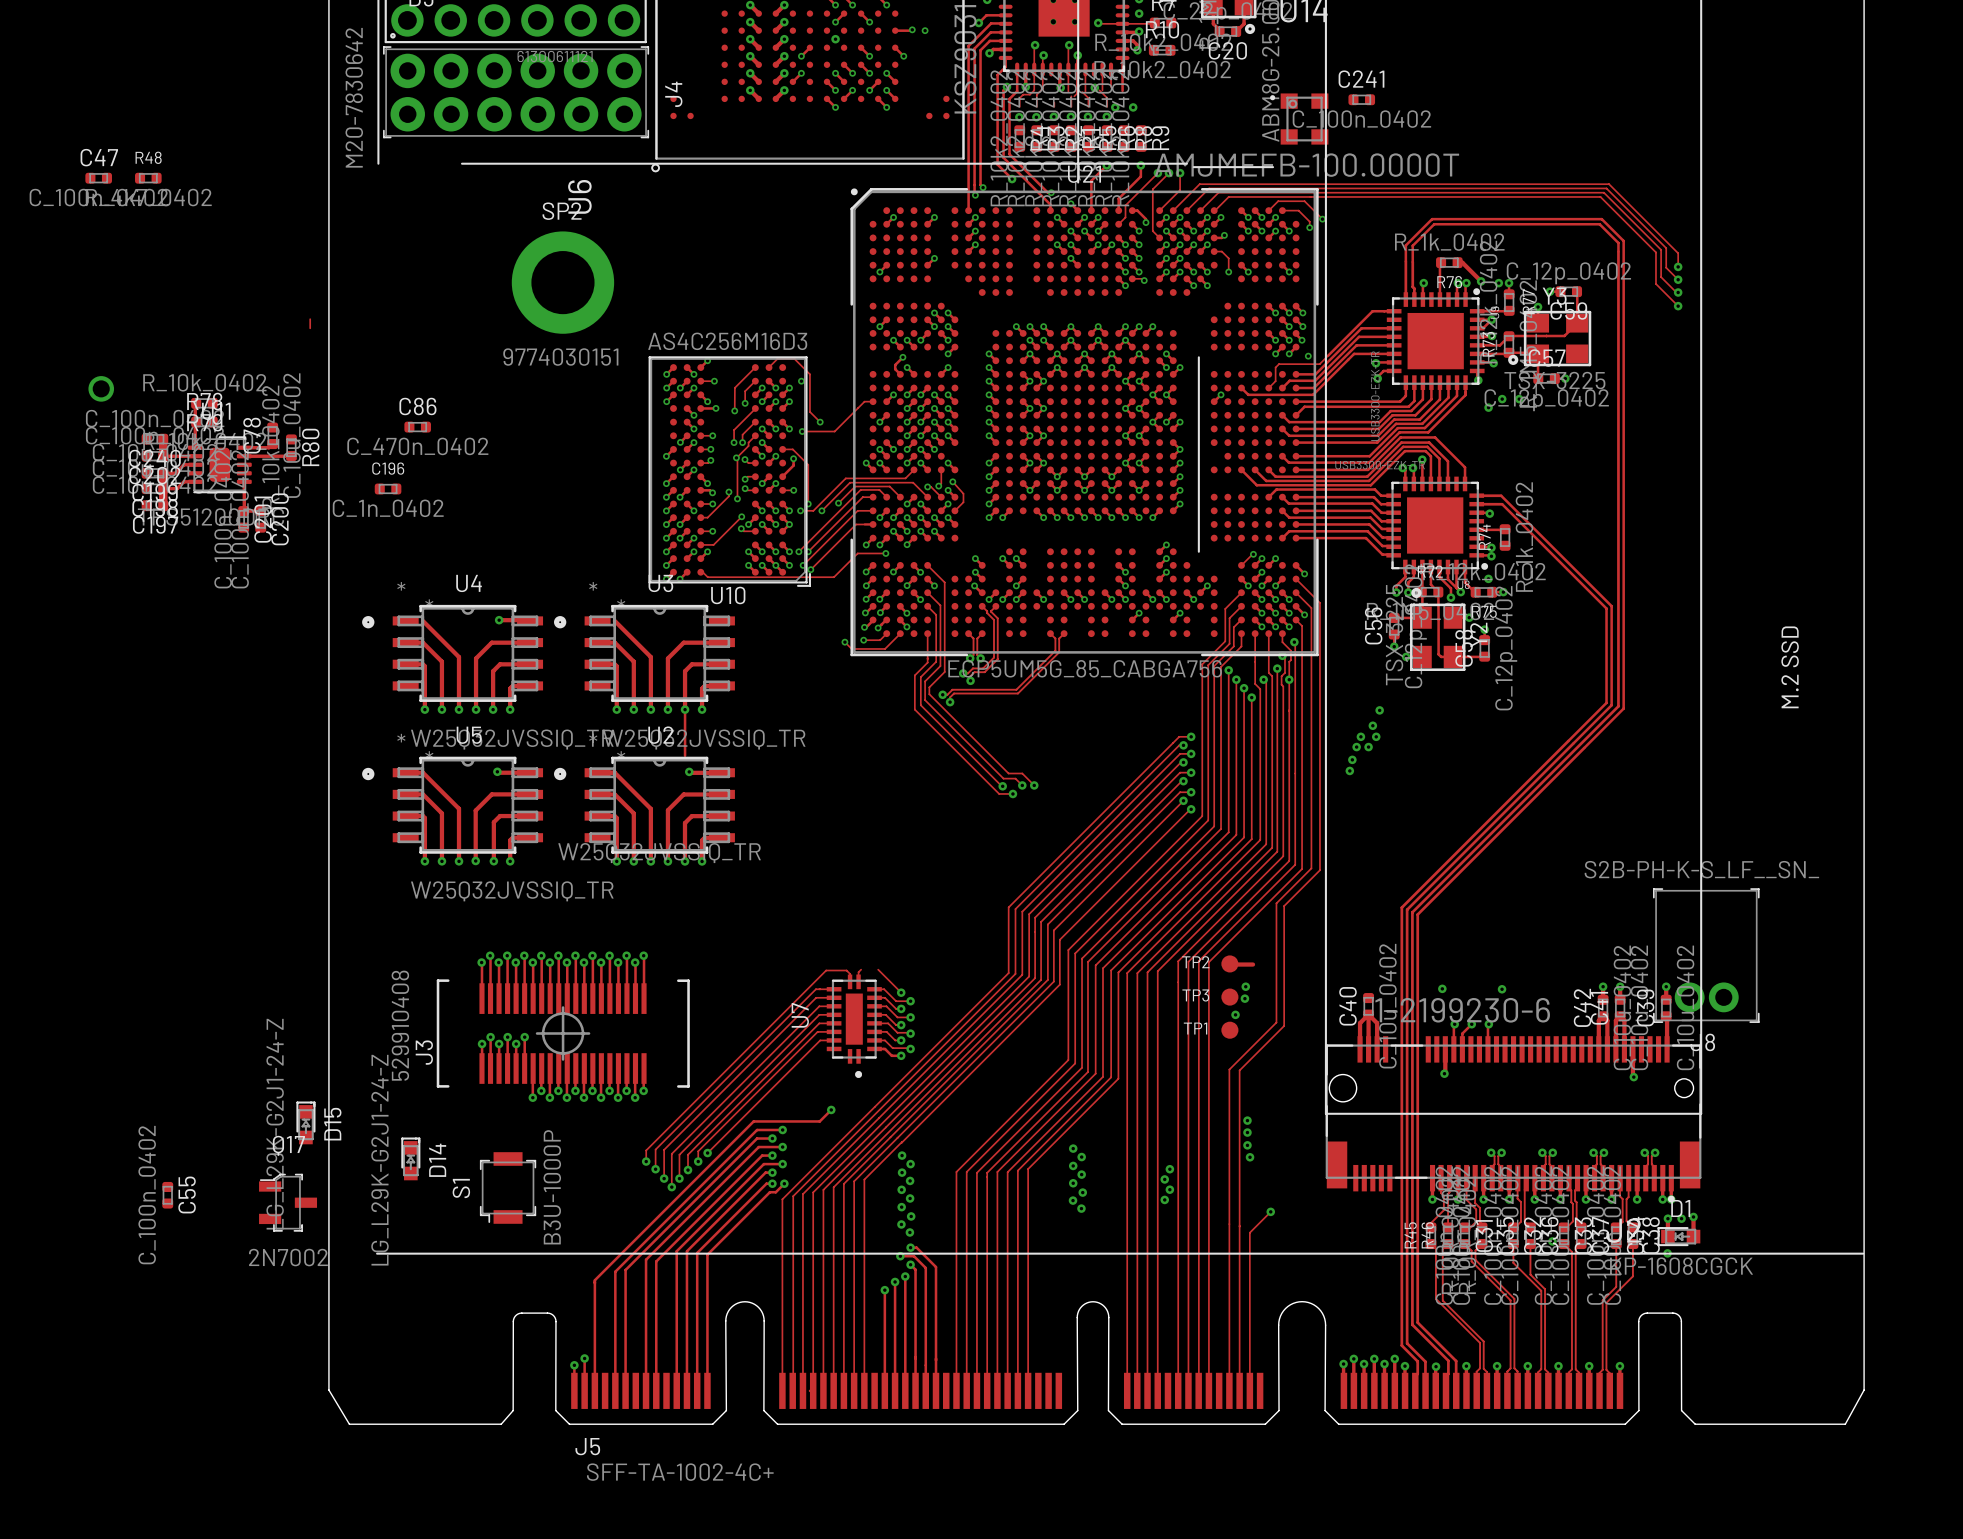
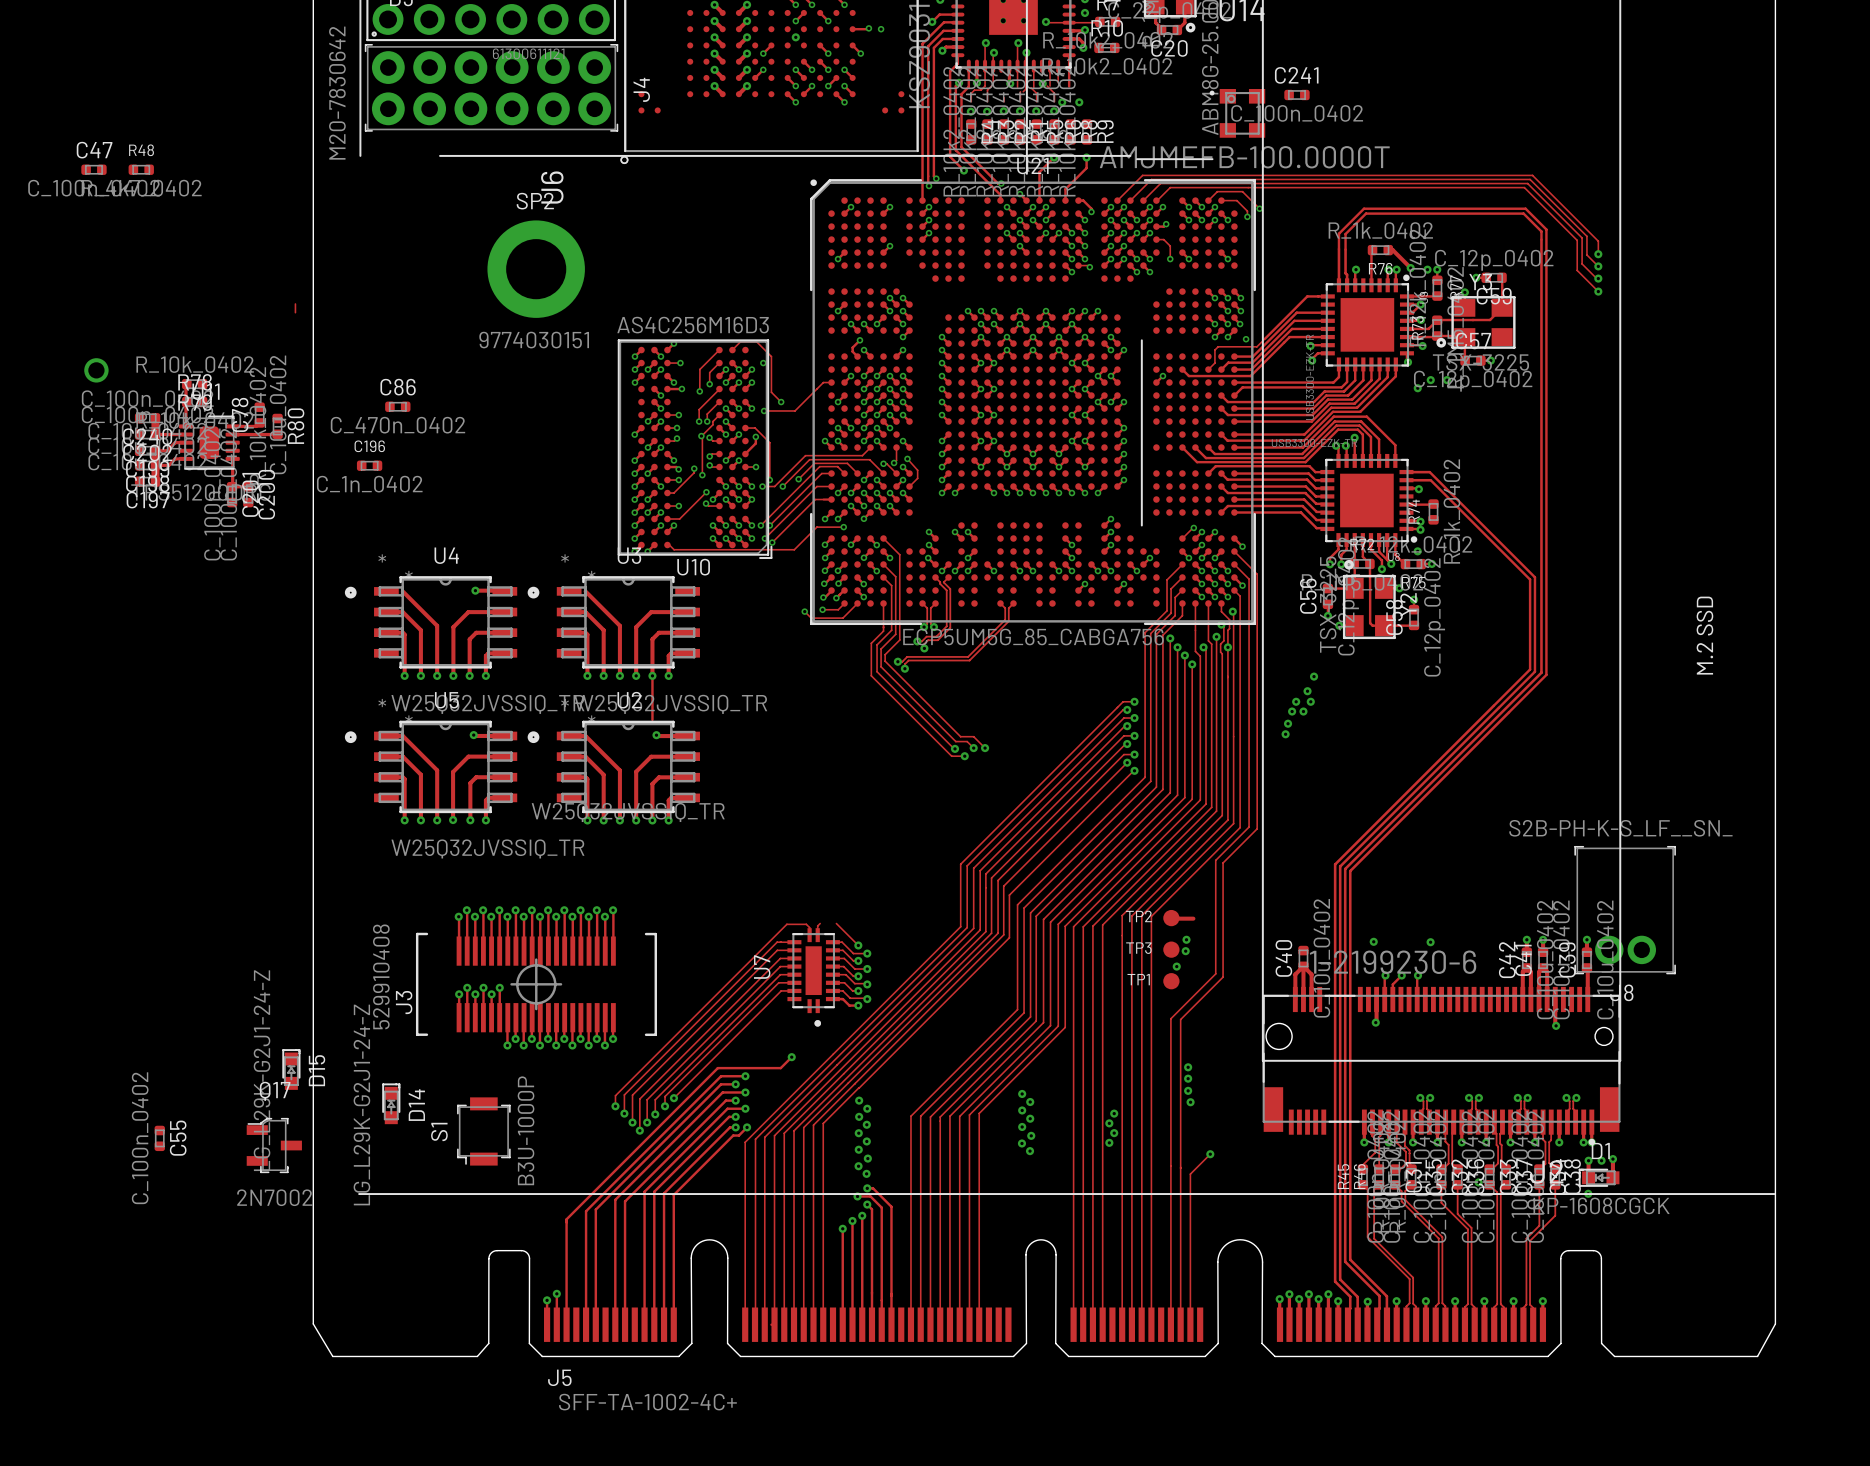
track: (1157, 173) (1125, 205) (1125, 217) (1118, 224) -> none
via: (1157, 173) -> none
track: (1169, 173) (1152, 189) (1152, 231) (1159, 237) -> none
via: (1169, 173) -> none
track: (1180, 173) (1180, 190) (1159, 210) -> none
via: (1180, 173) -> none

